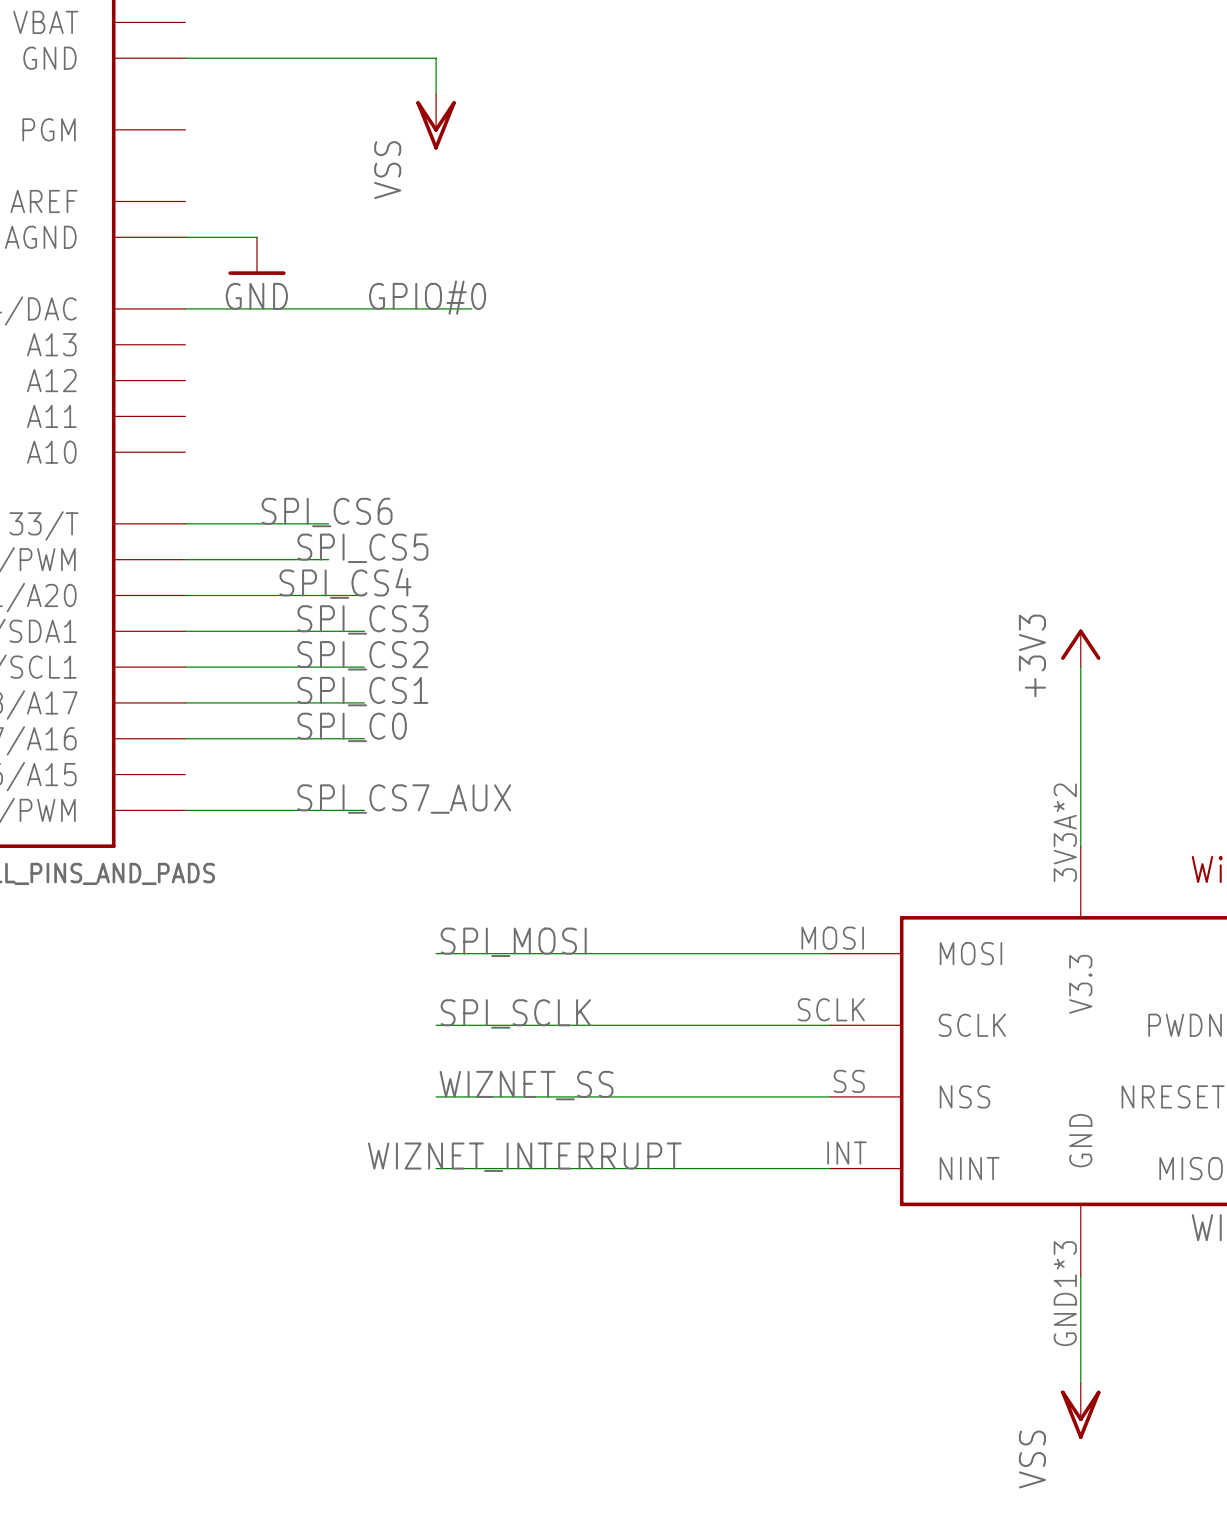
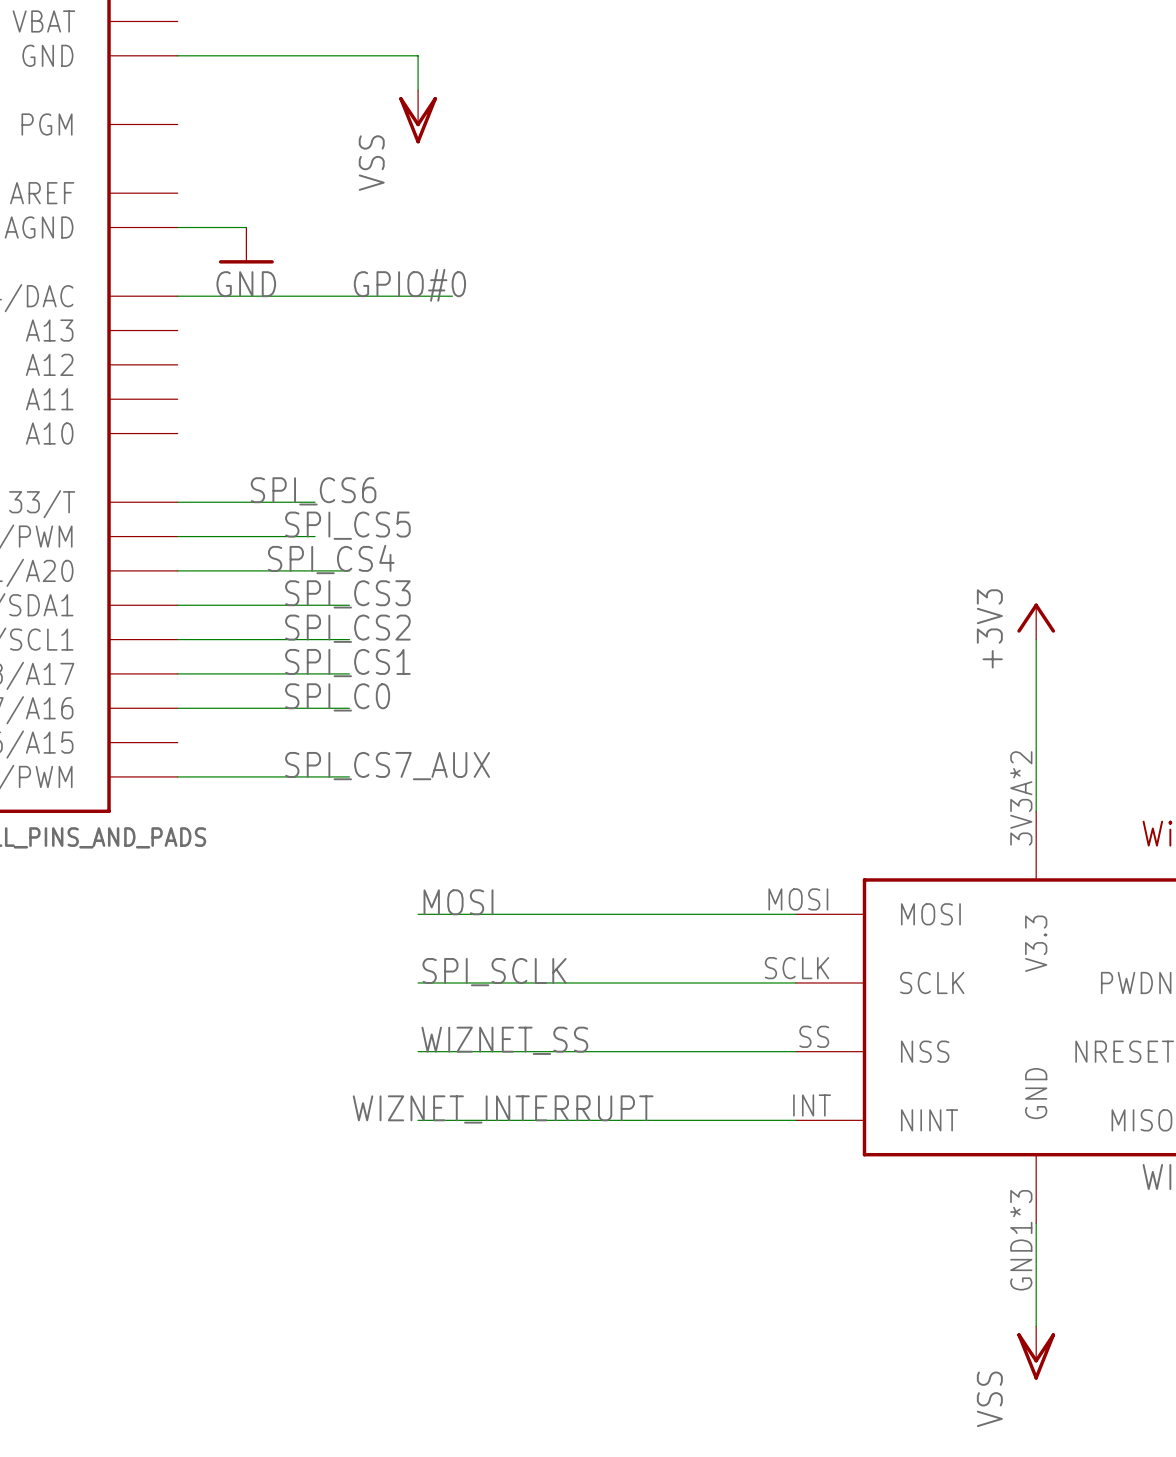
label: SPI_MOSI (513, 942) -> MOSI (458, 902)

